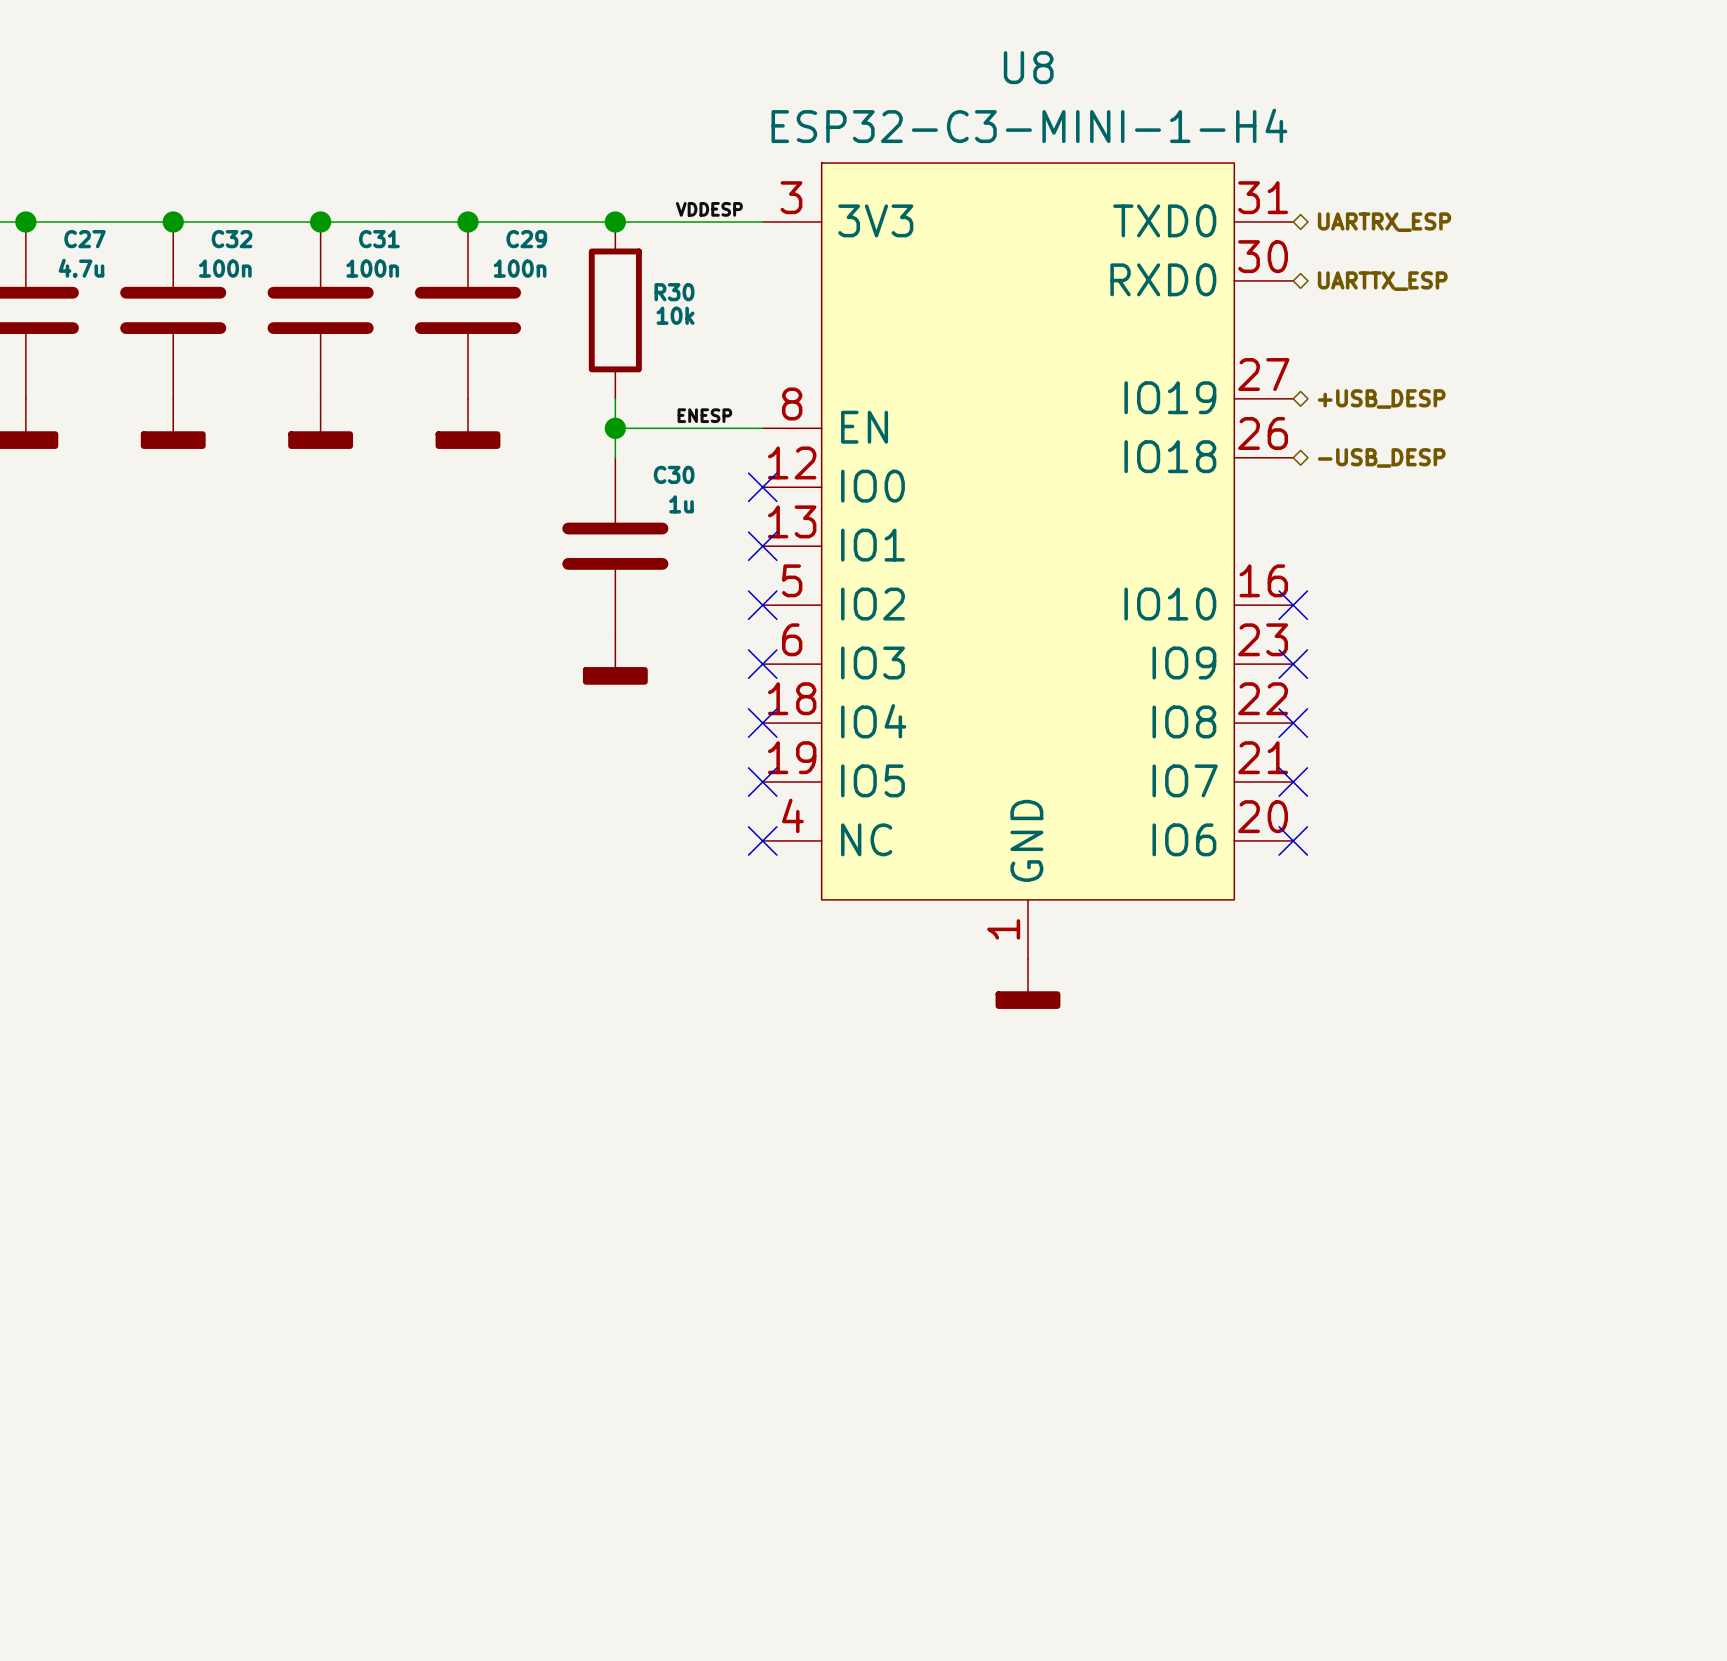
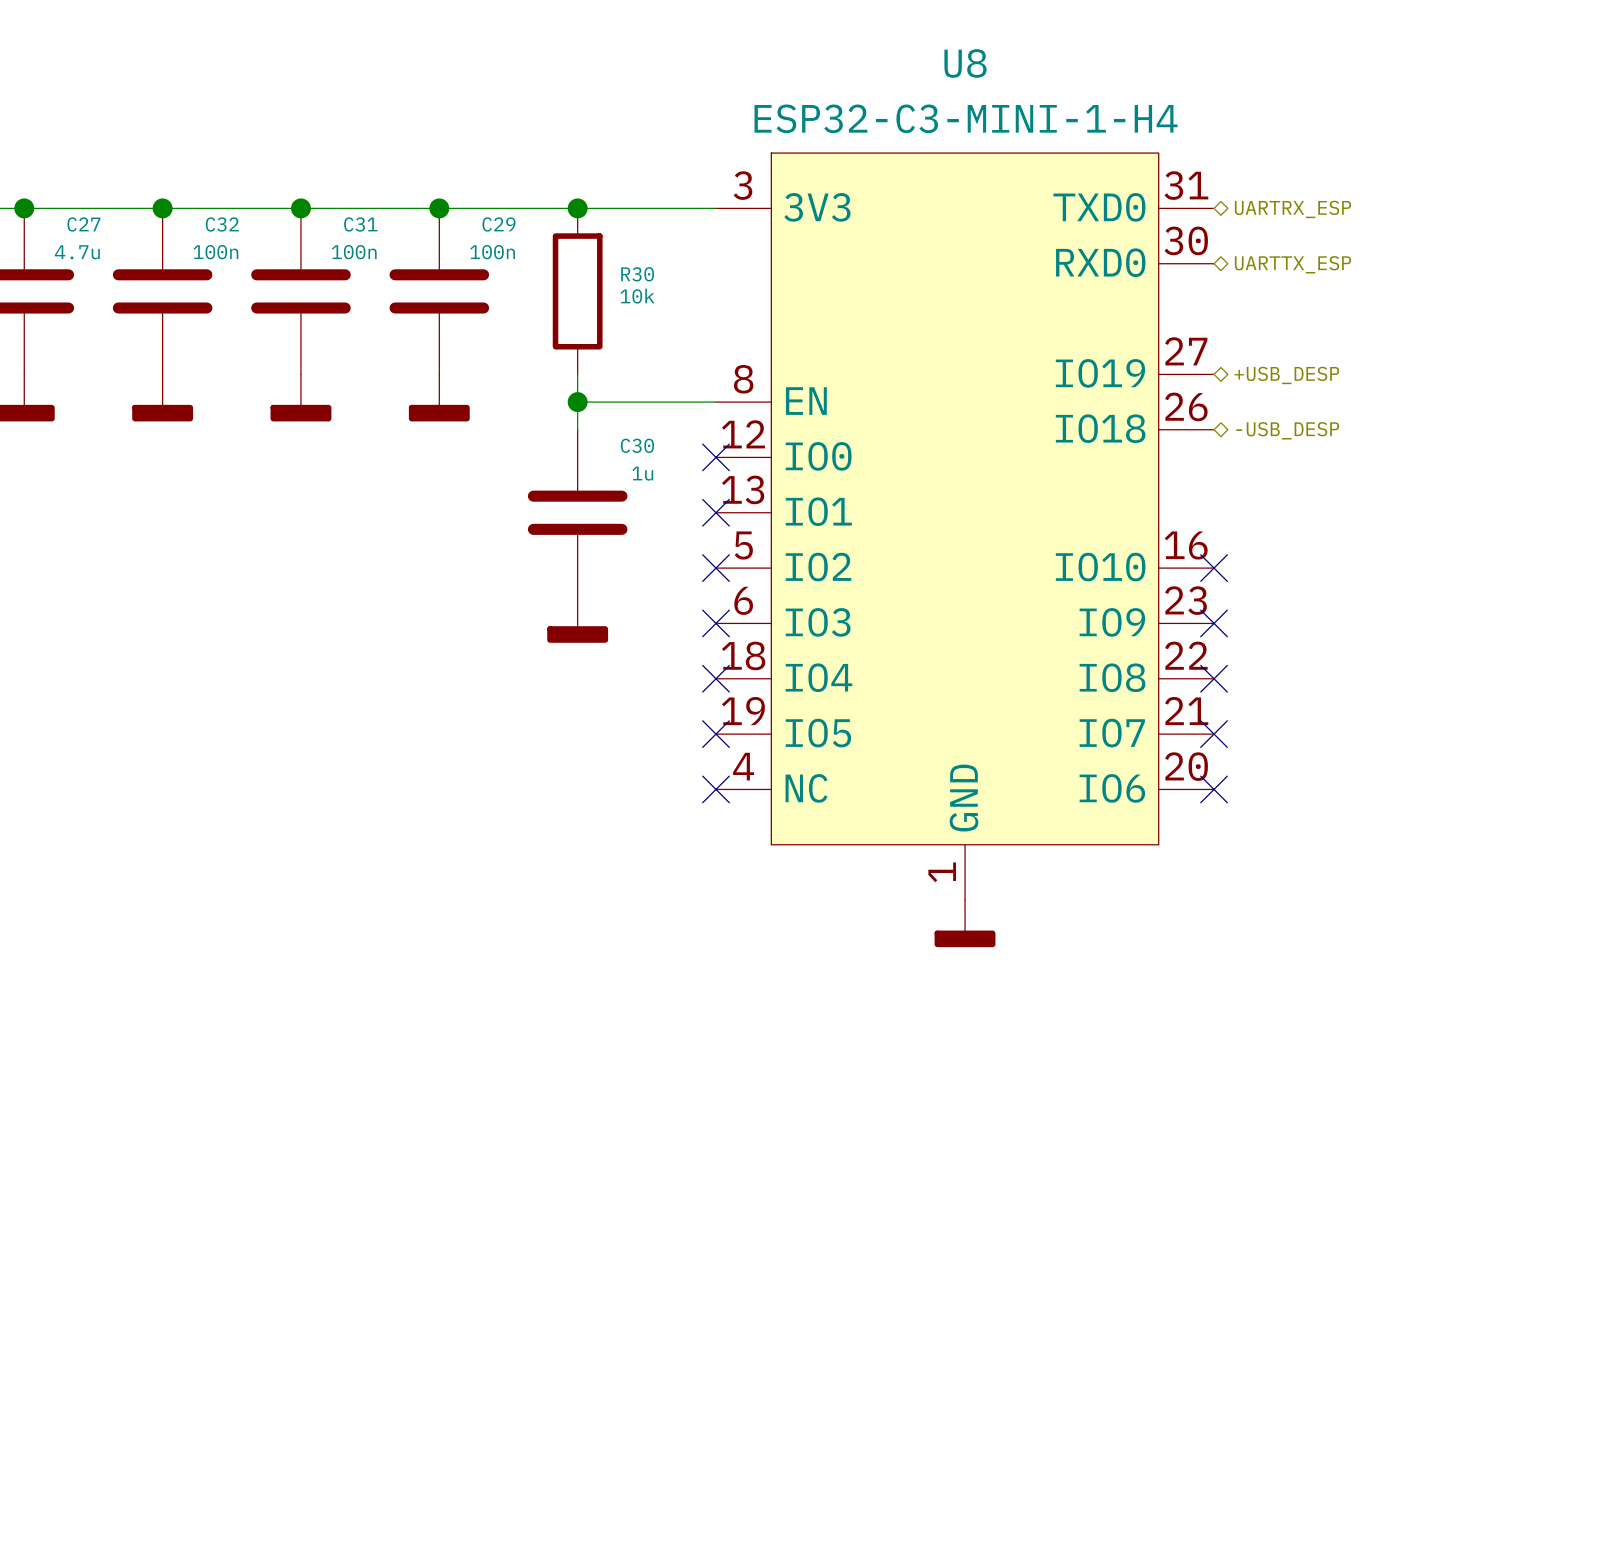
label: VDDESP (709, 209) -> none
label: ENESP (704, 415) -> none

